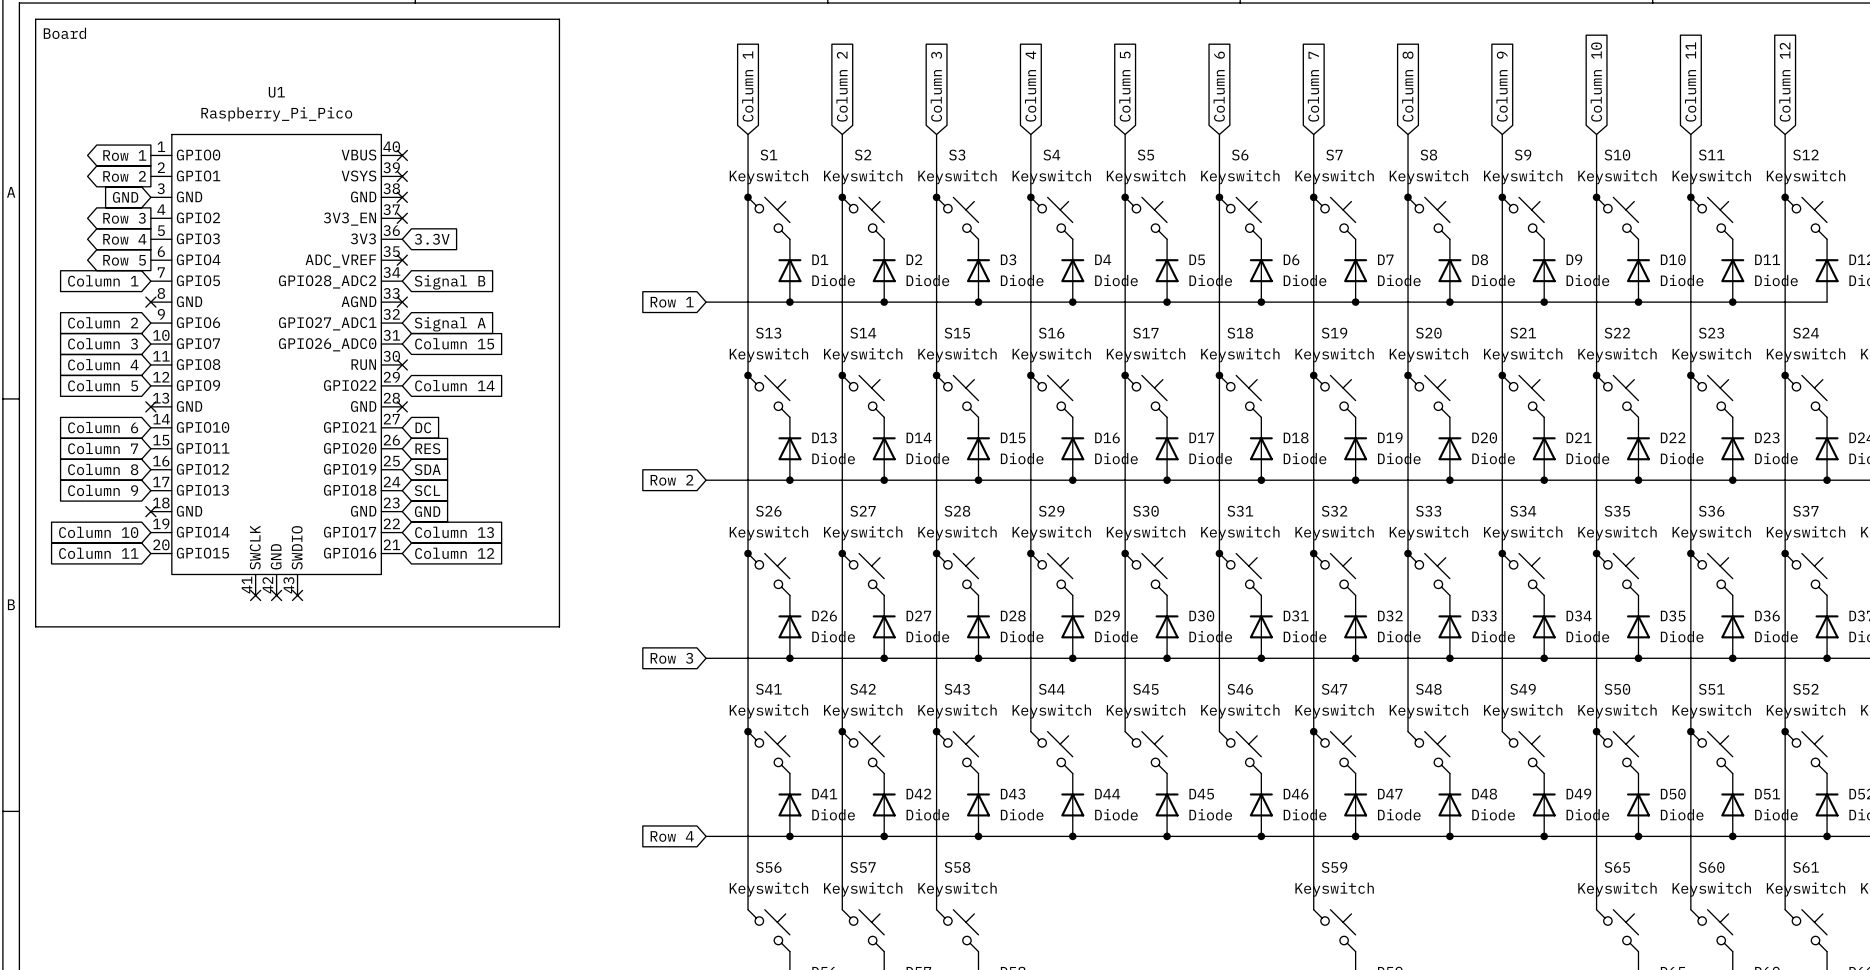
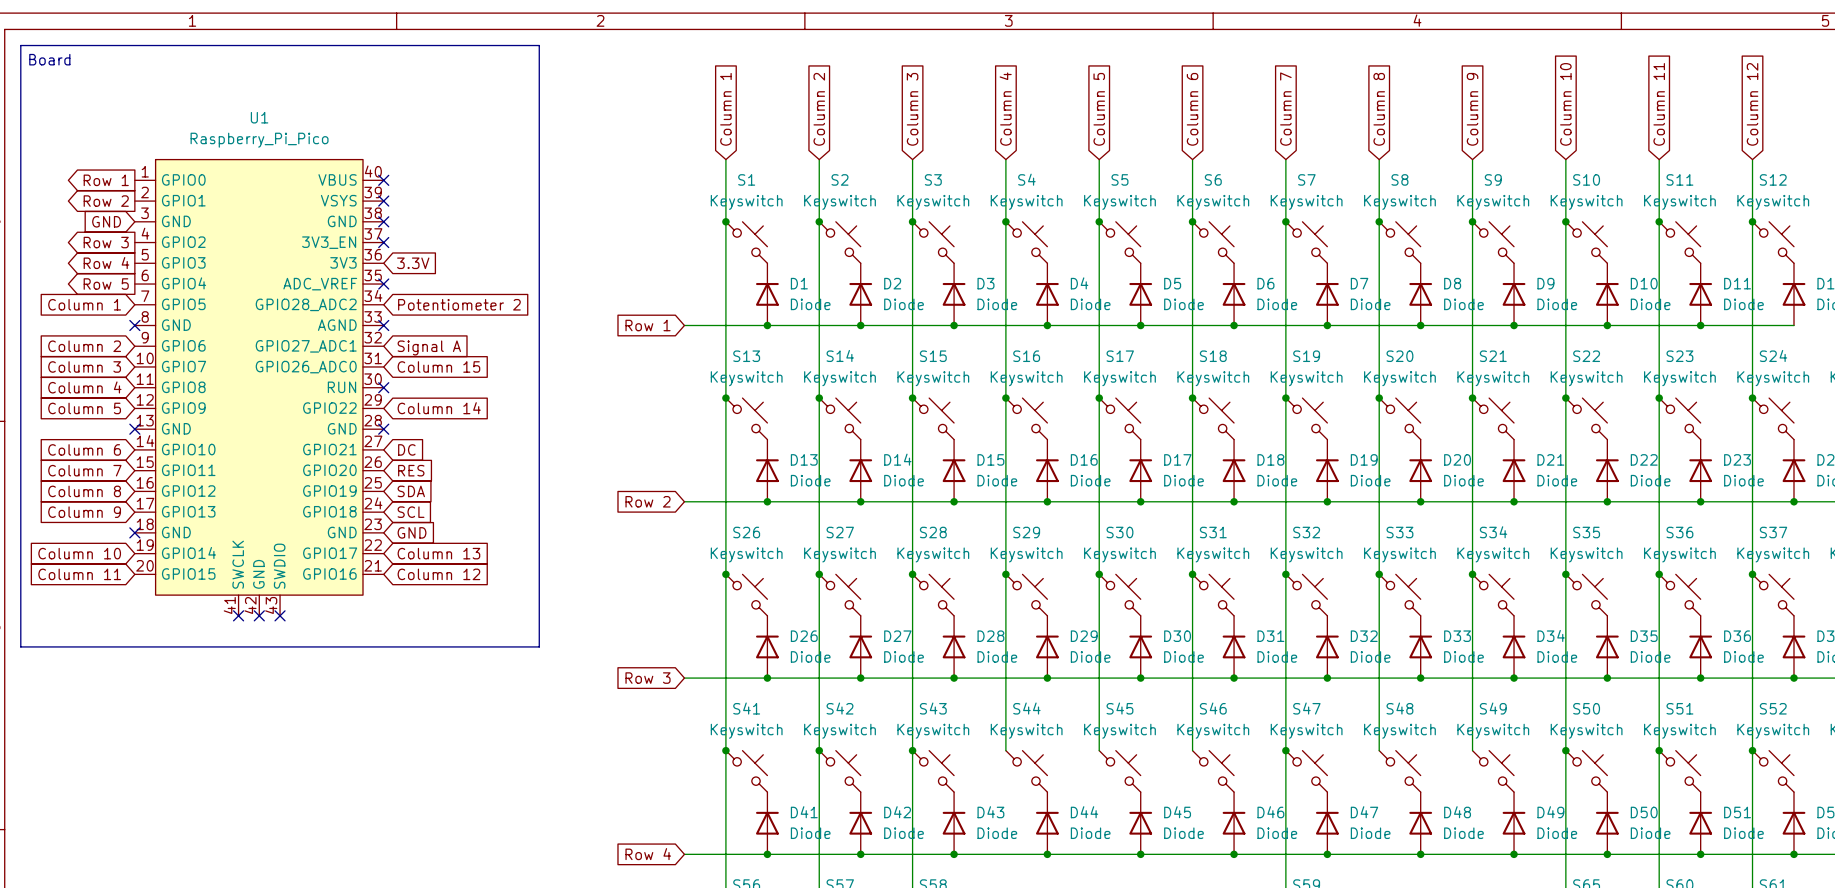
global label: Signal B (450, 282) -> Potentiometer 2 (459, 304)

